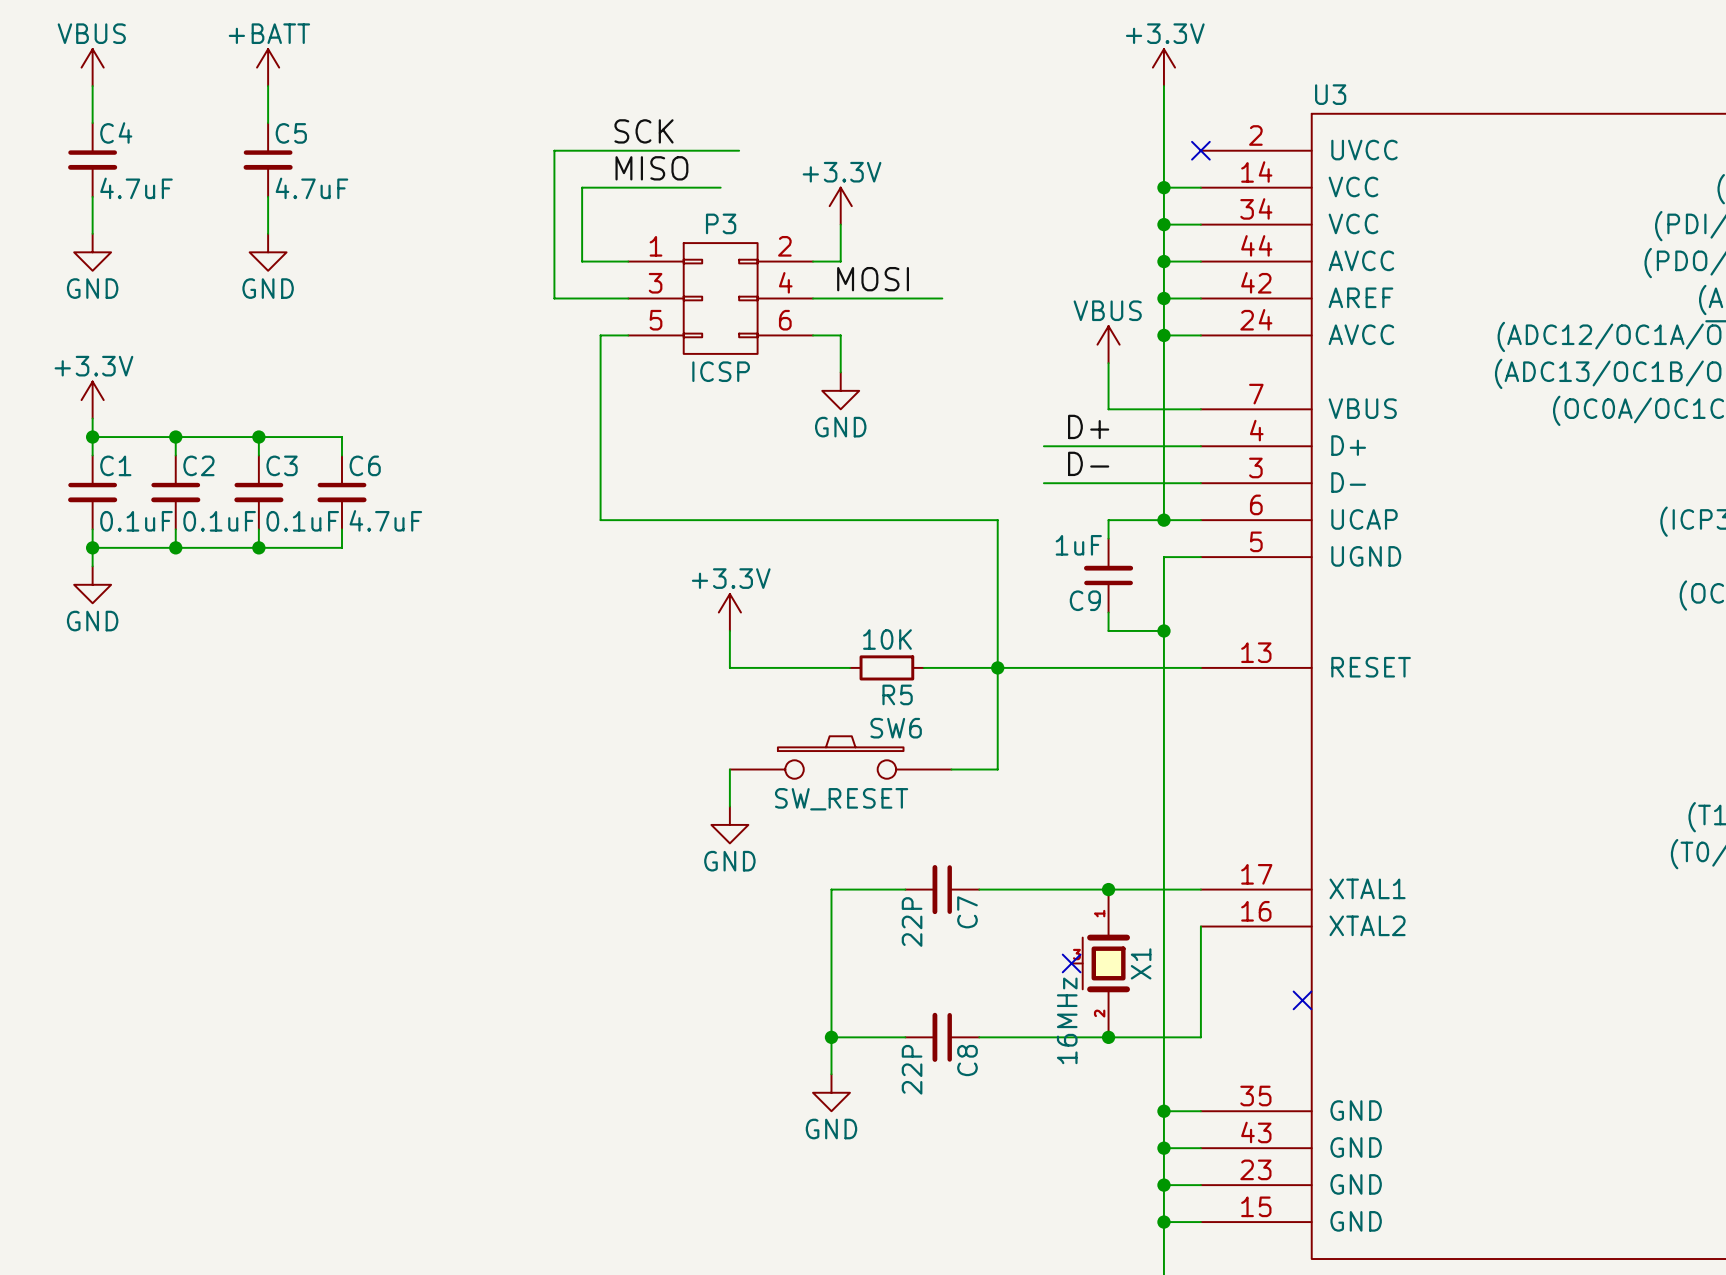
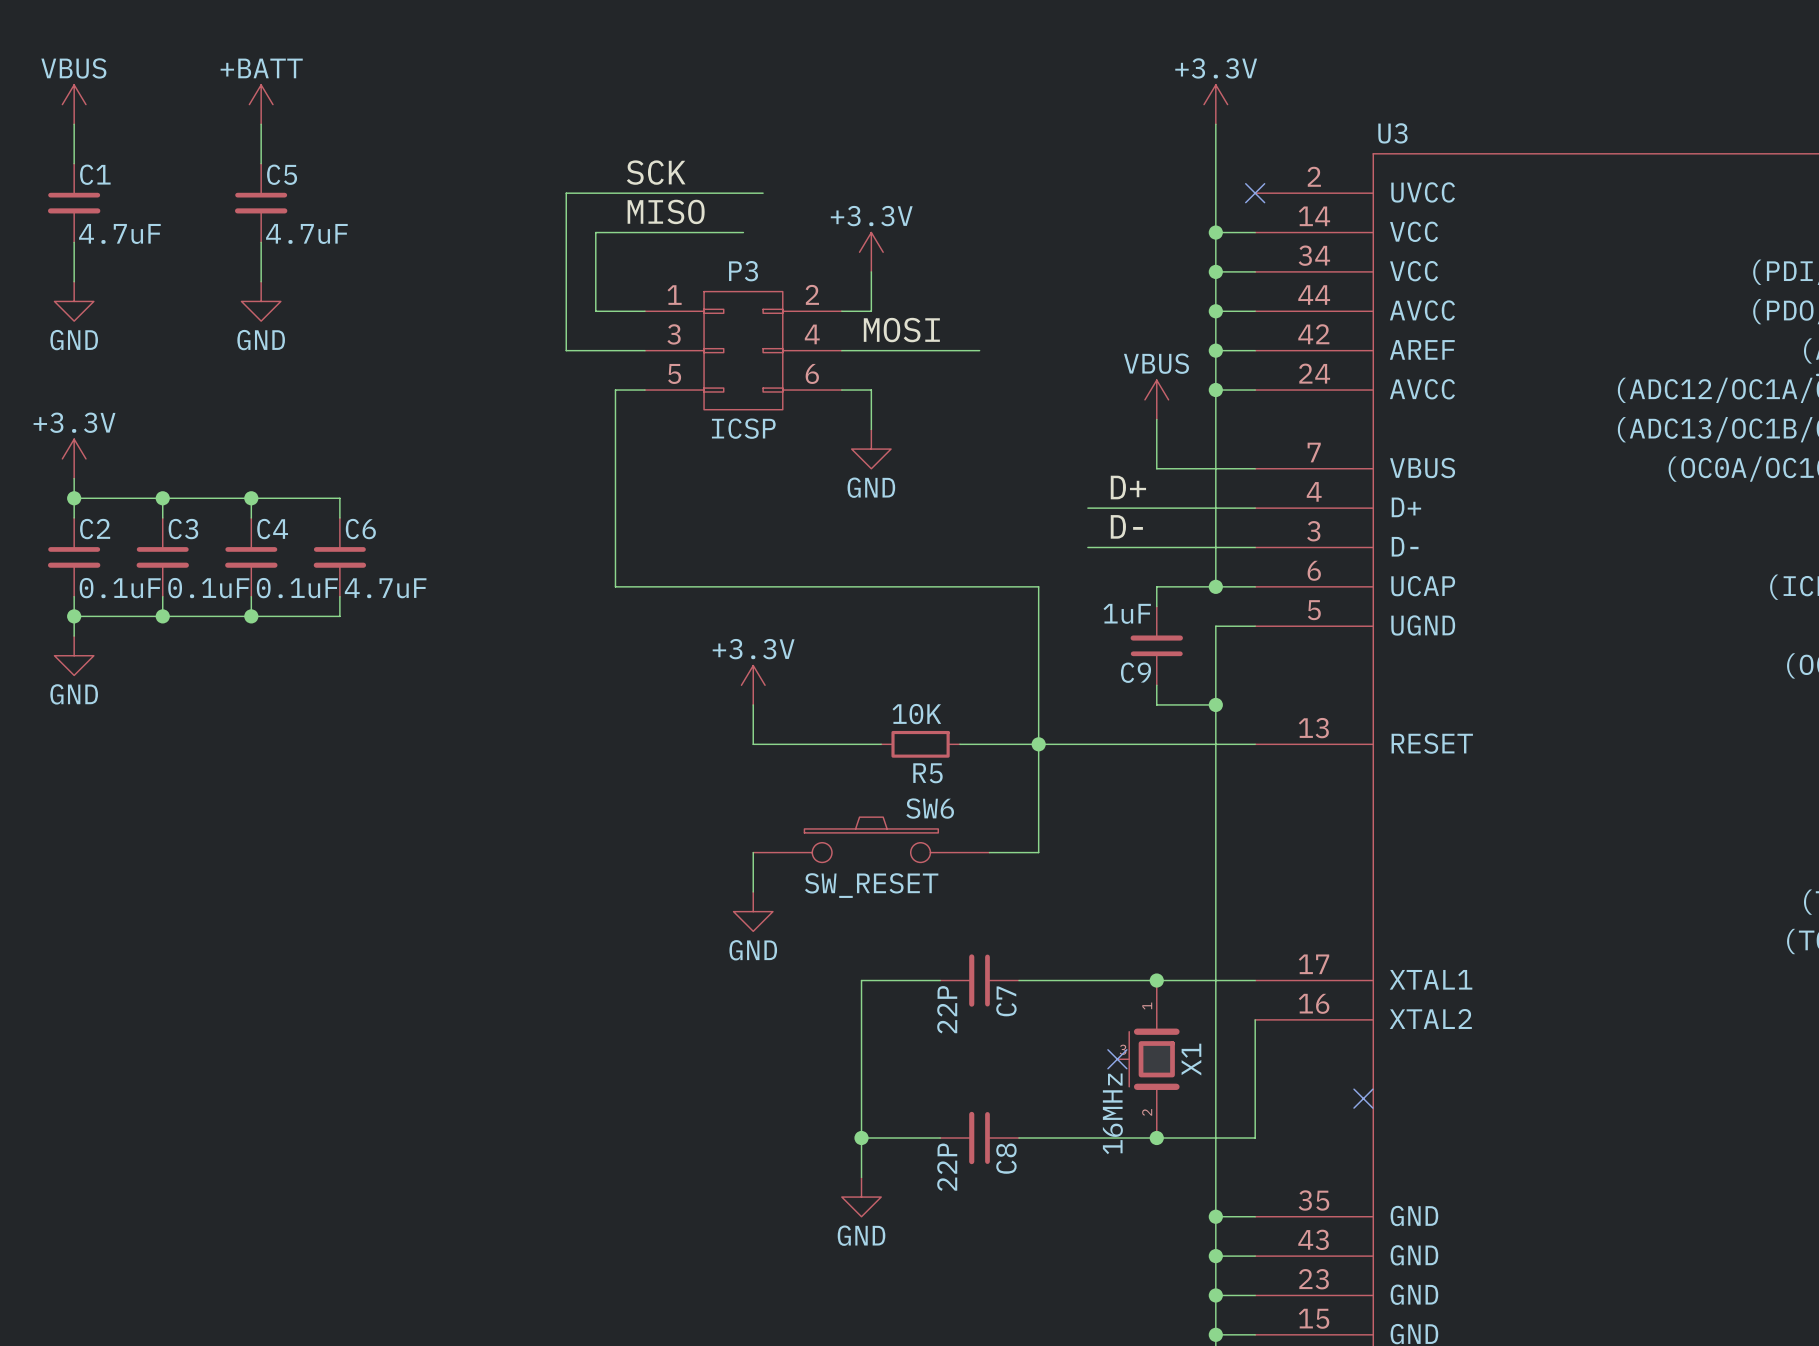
C4 name: C4 (116, 132) -> C1 (95, 174)
C1 name: C1 (115, 465) -> C2 (95, 529)
C2 name: C2 (198, 465) -> C3 (183, 529)
C3 name: C3 (282, 465) -> C4 (272, 529)

